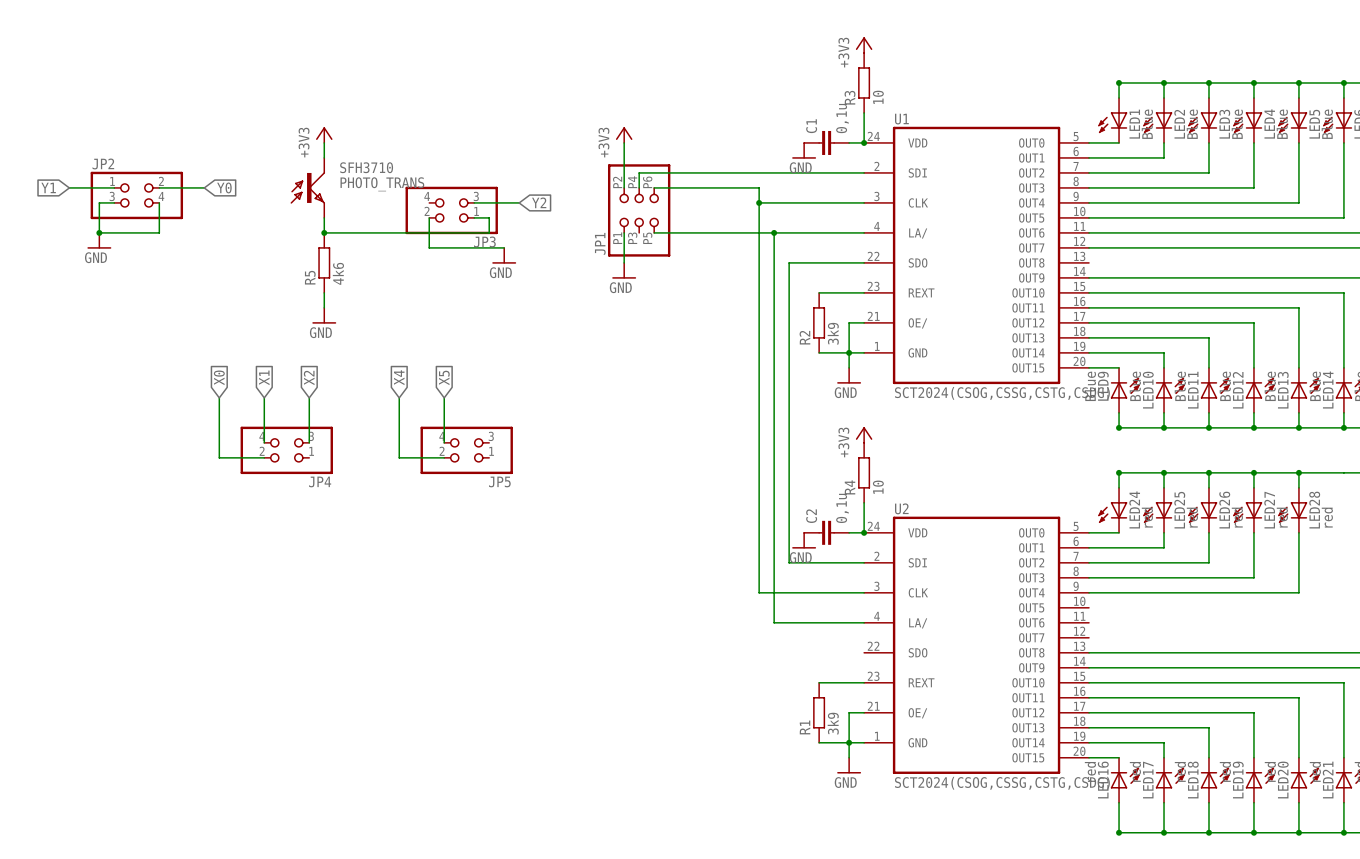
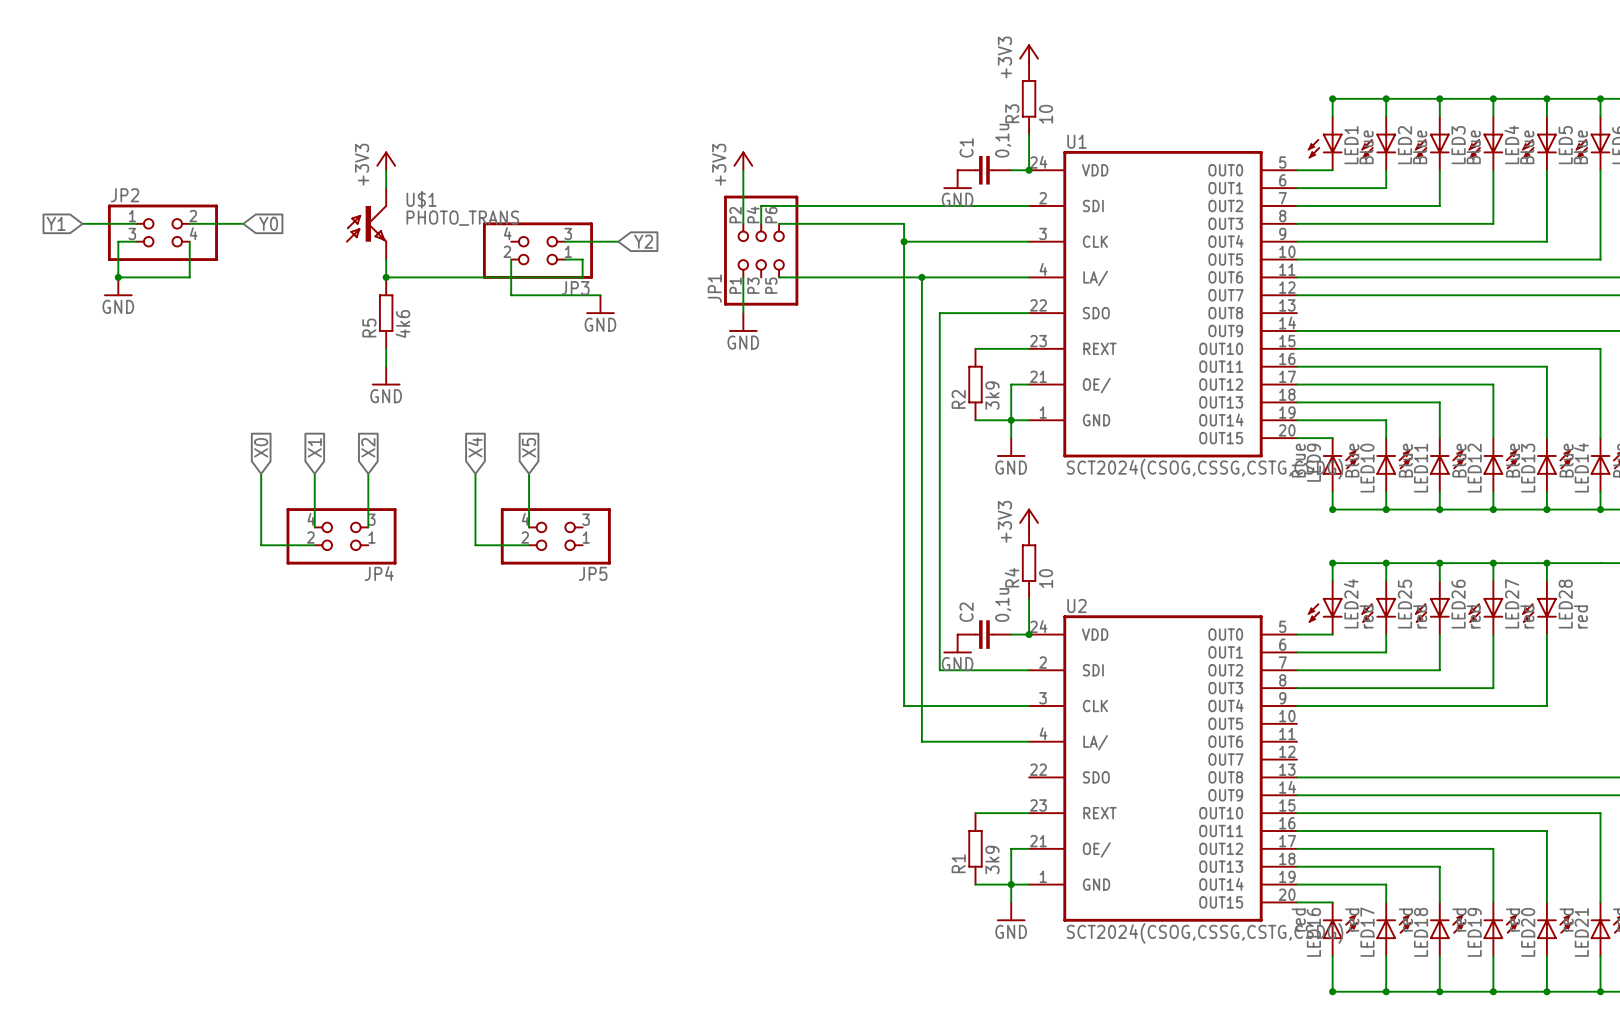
SFH3710 name: SFH3710 (366, 167) -> U$1 (421, 199)

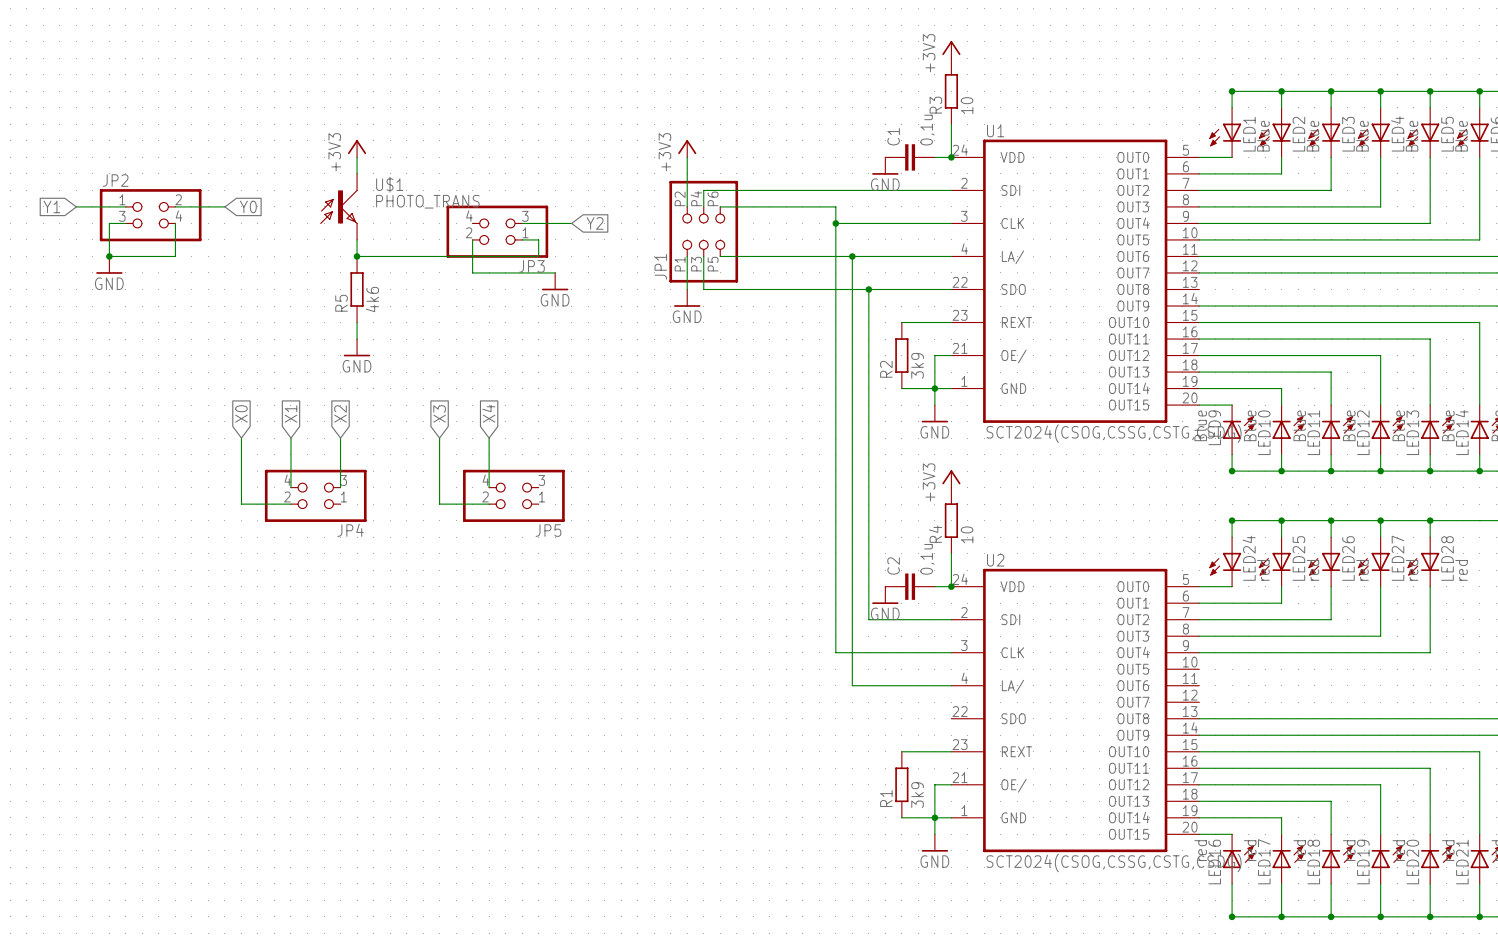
wire: none -> (703, 256) (703, 289) (868, 289)
junction: none -> (868, 289)
global label: X4 (475, 447) -> X3 (439, 413)
global label: X5 (529, 447) -> X4 (488, 413)

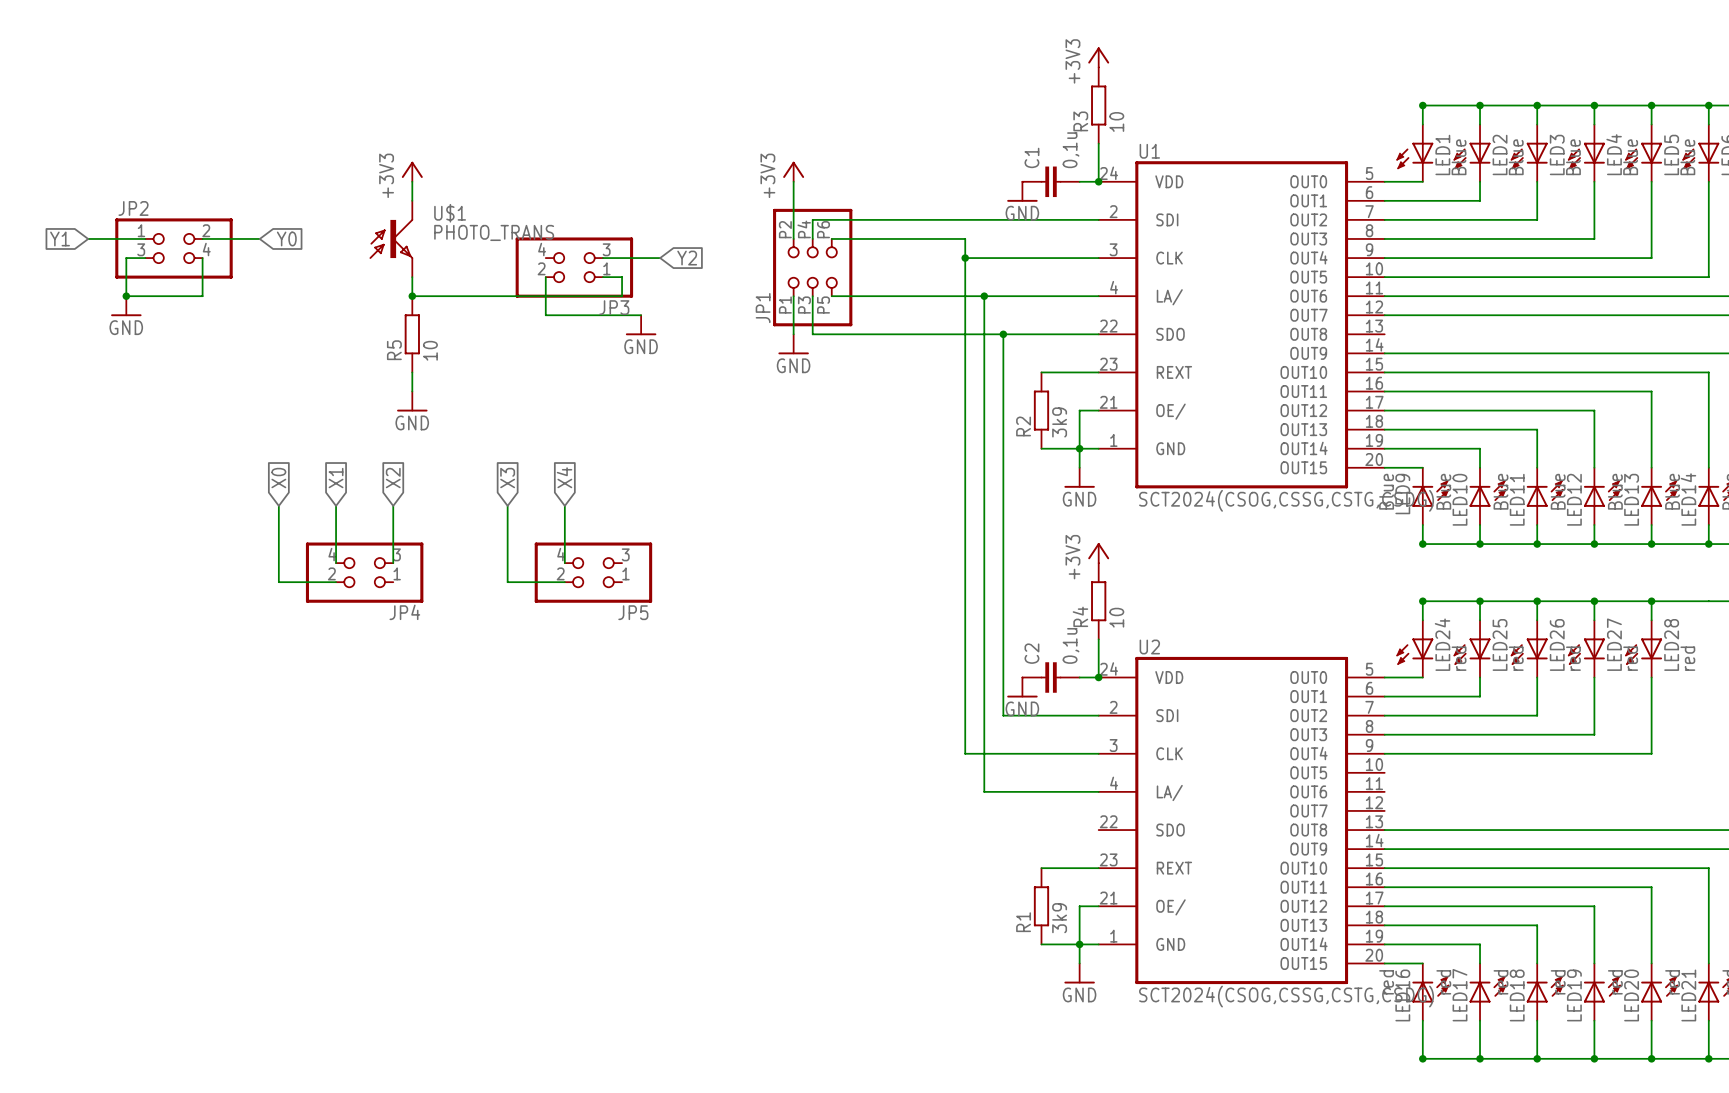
R5 value: 4k6 (372, 299) -> 10 (430, 350)

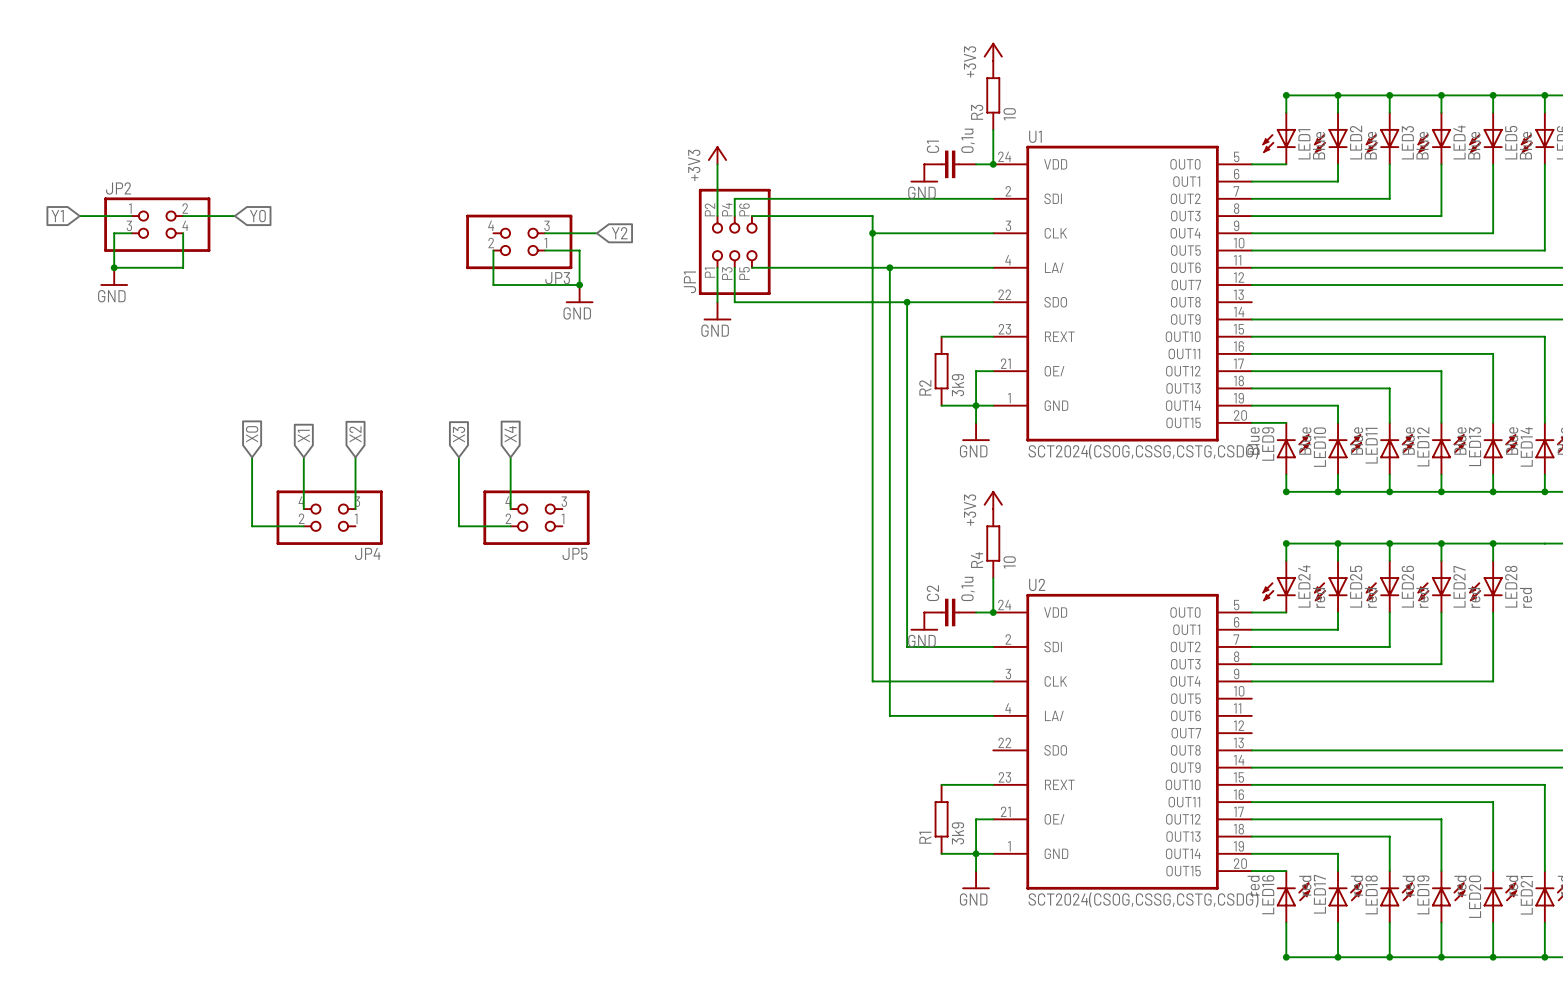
power symbol: +3V3 (412, 171) -> none
wire: (412, 181) (412, 200) -> none
U$1: PHOTO_TRANS (391, 238) -> none
wire: (412, 277) (412, 296) (622, 296) (622, 277) -> (579, 285) (579, 250) (562, 250)
junction: (412, 296) -> none
junction: none -> (579, 285)
R5: 10 (412, 334) -> none
wire: (412, 372) (412, 391) -> none
power symbol: GND (412, 401) -> none

